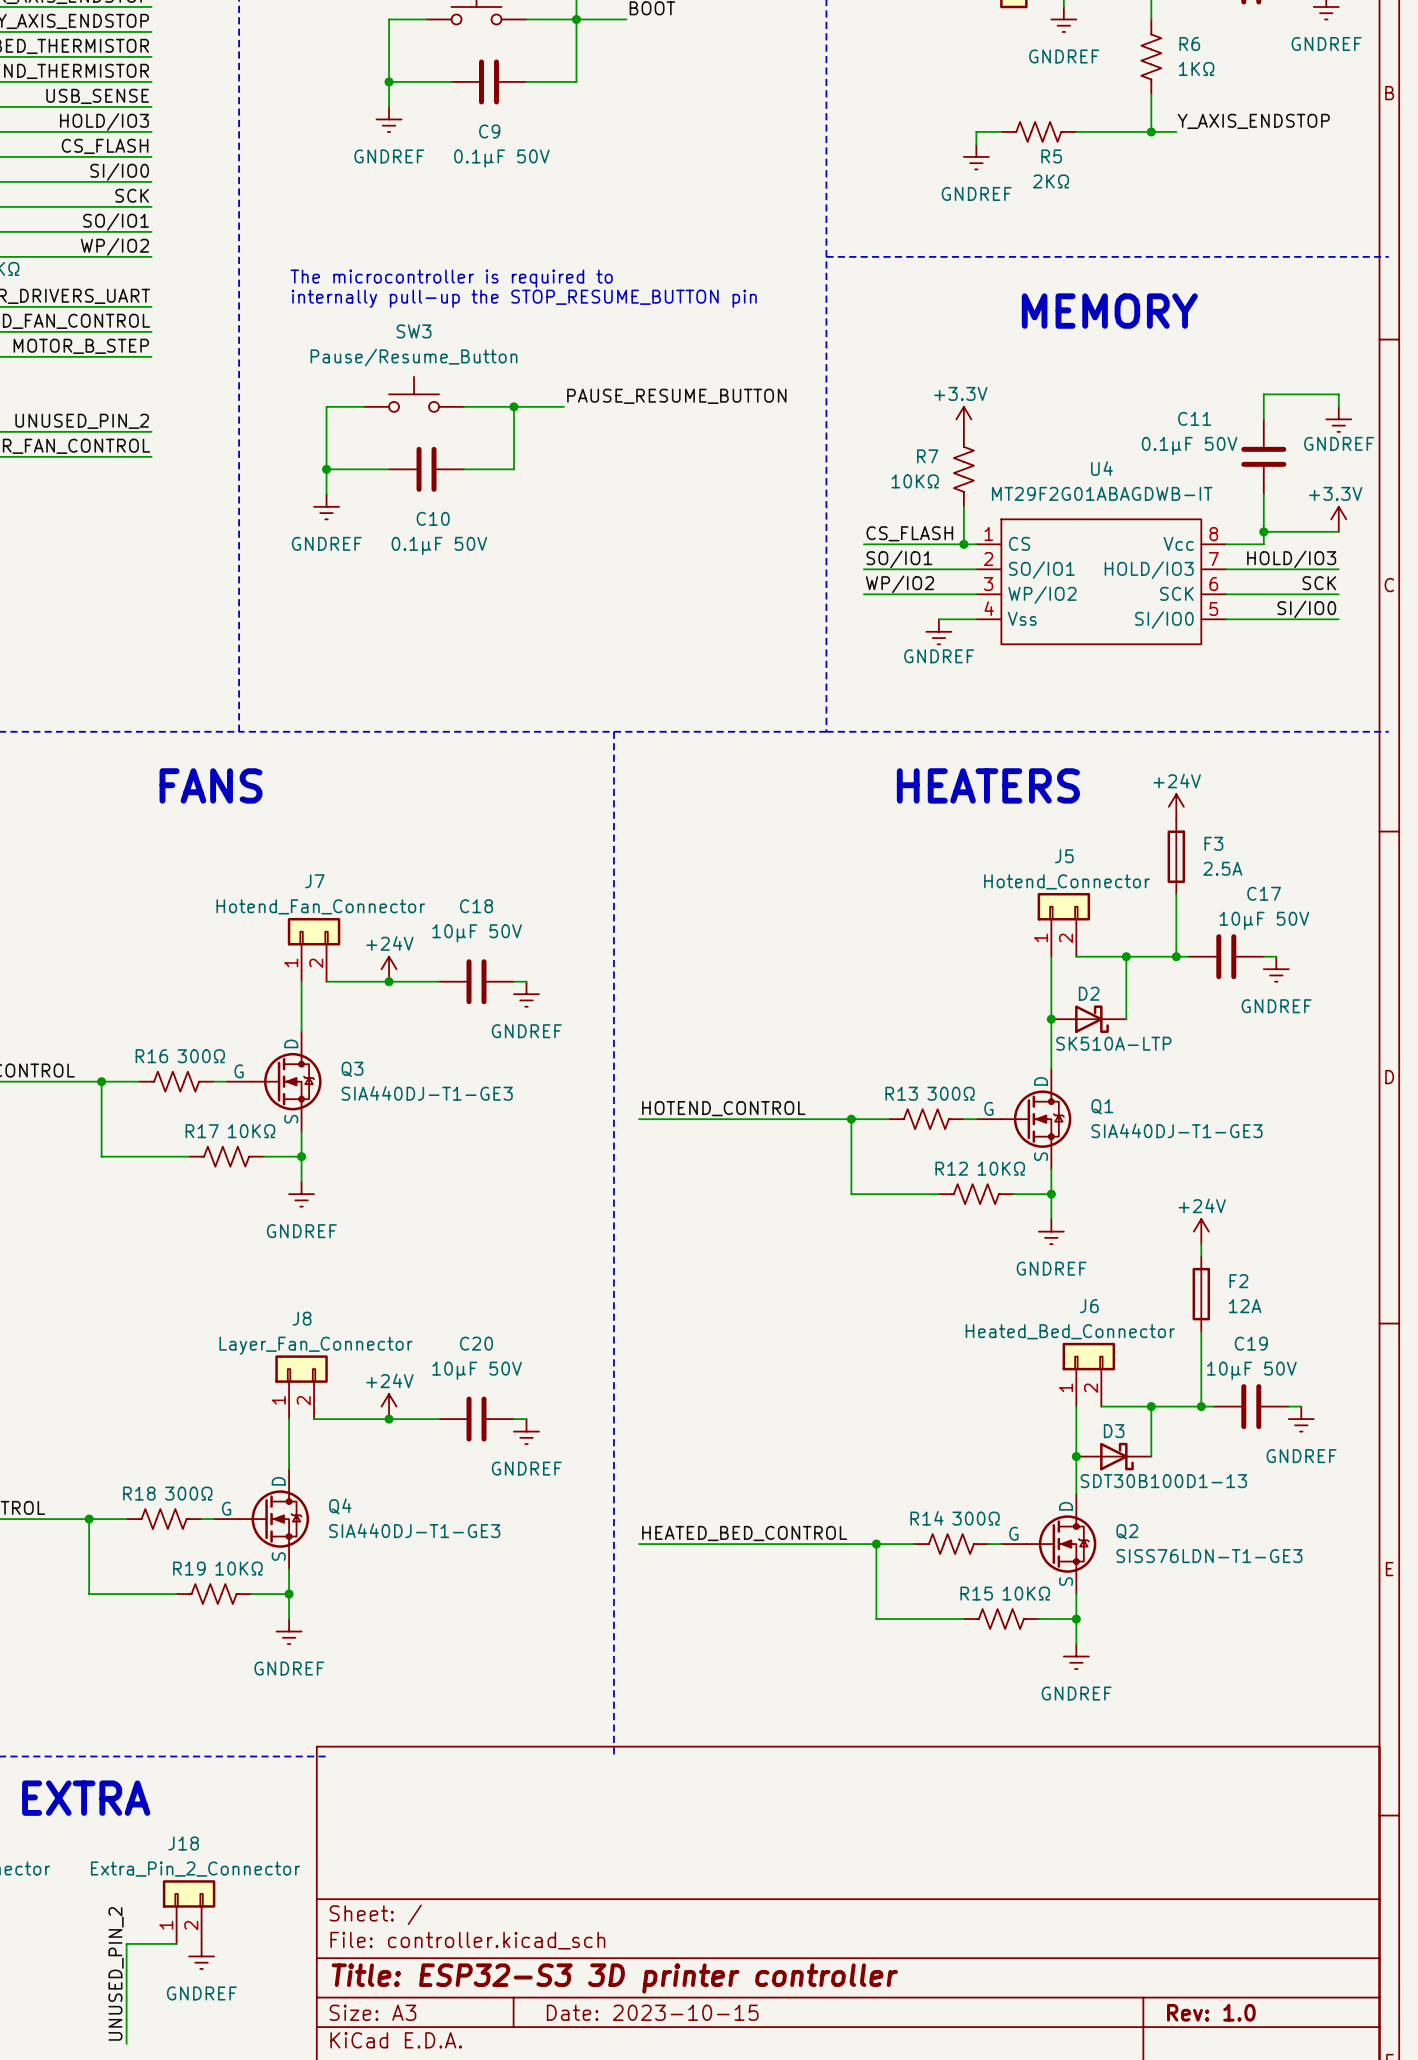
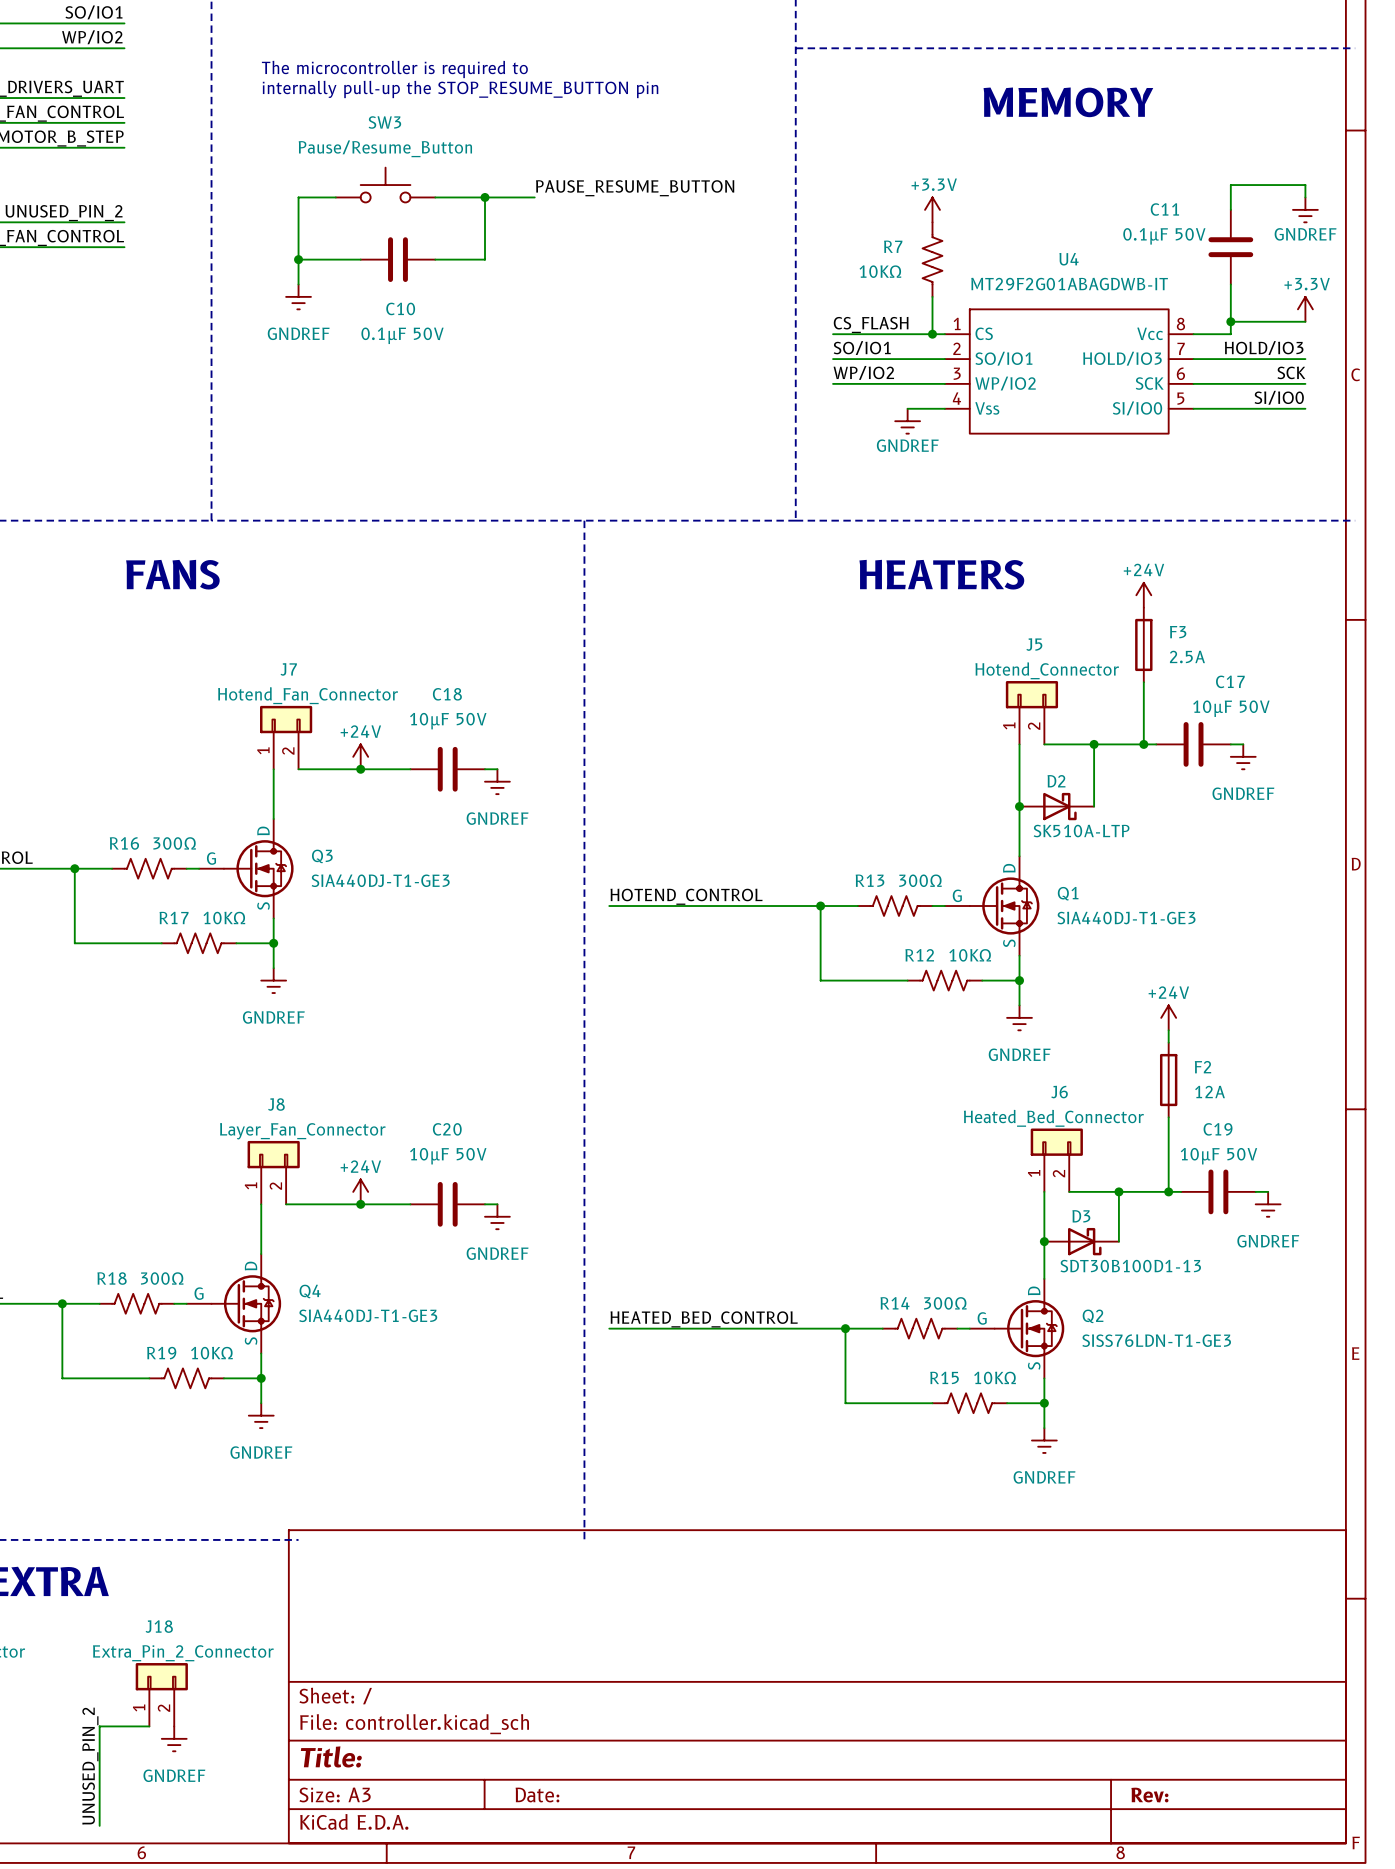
title block: Title: ESP32-S3 3D printer controller (614, 1978) -> Title: (331, 1756)
title block: Date: 2023-10-15 (652, 2012) -> Date: (537, 1795)
title block: Rev: 1.0 (1211, 2012) -> Rev: (1149, 1795)

